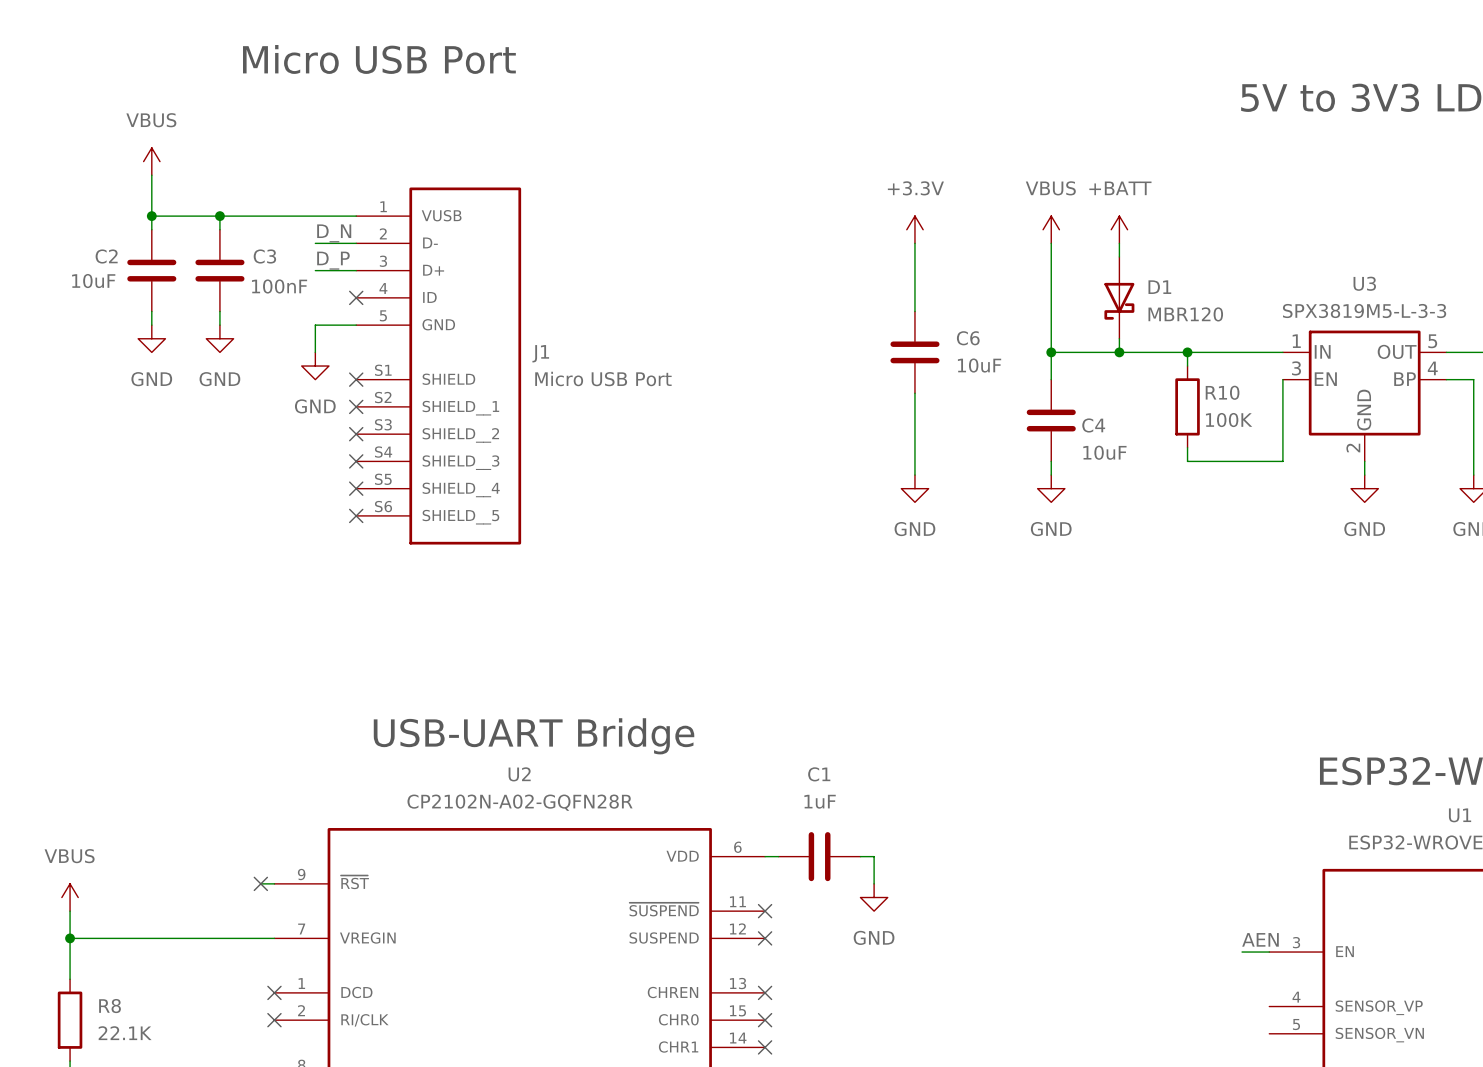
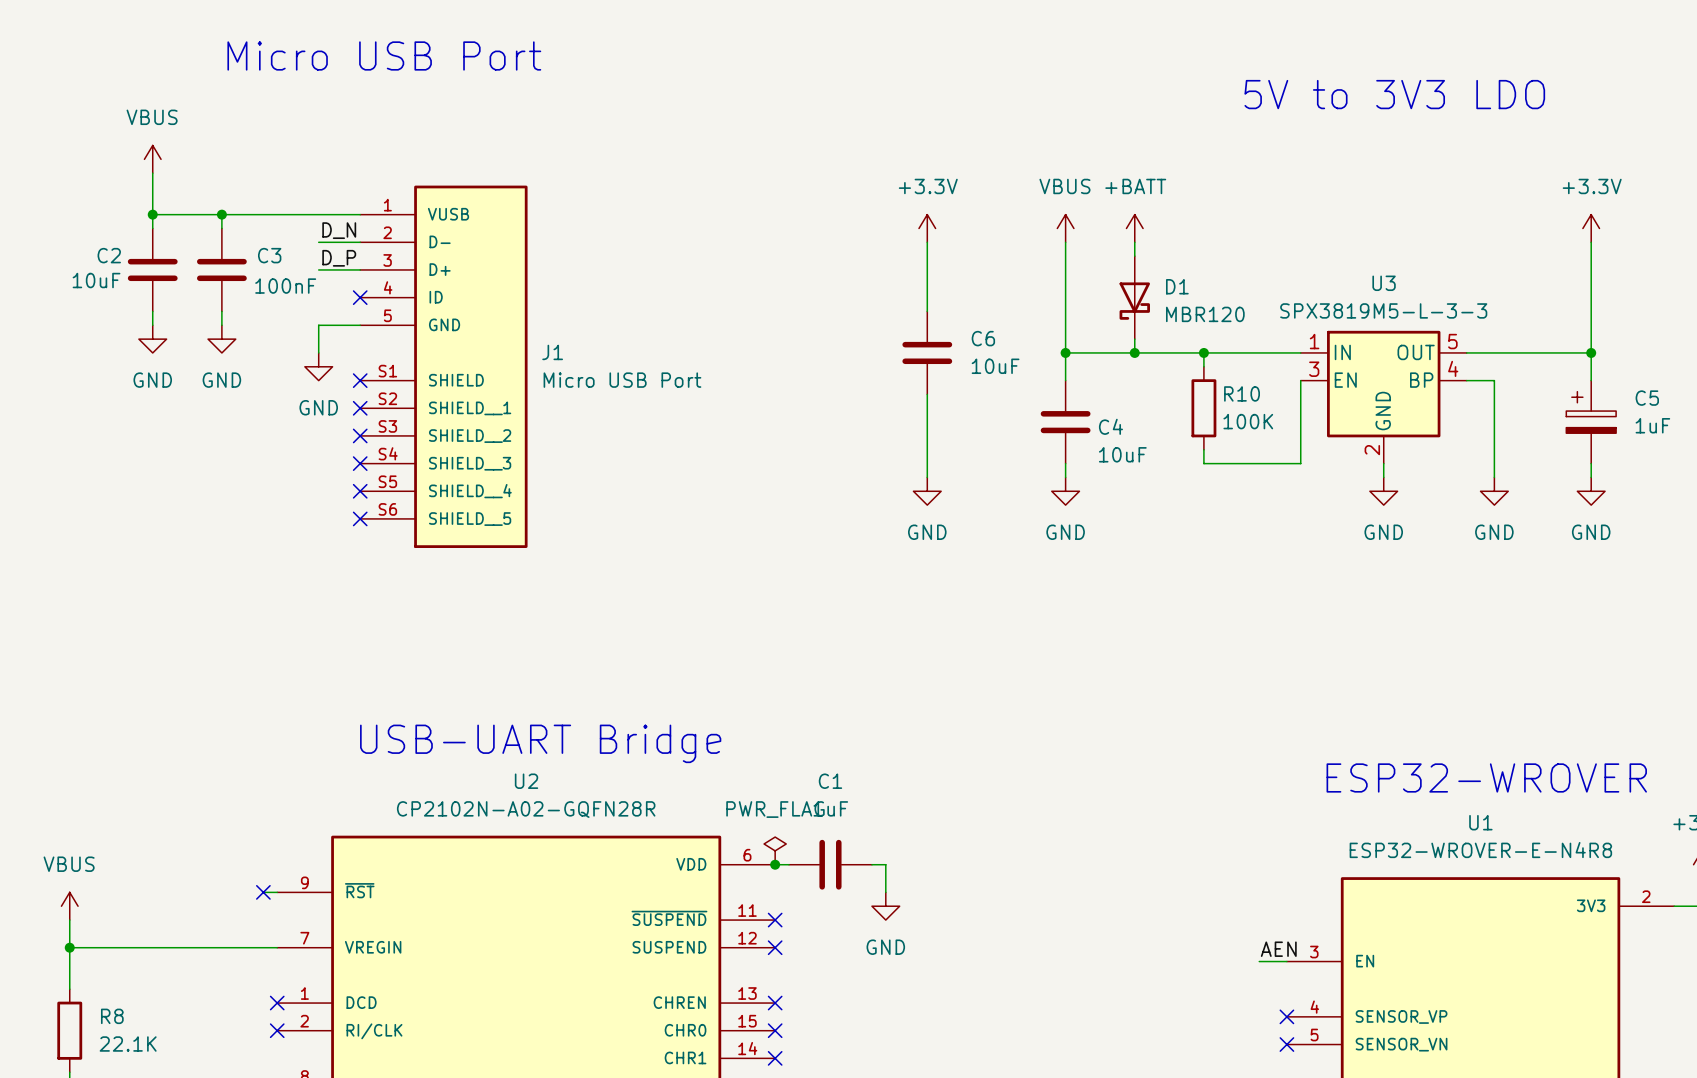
power symbol: none -> PWR_FLAG (775, 850)
junction: none -> (775, 864)
no-connect mark: none -> (1286, 1016)
no-connect mark: none -> (1286, 1044)

